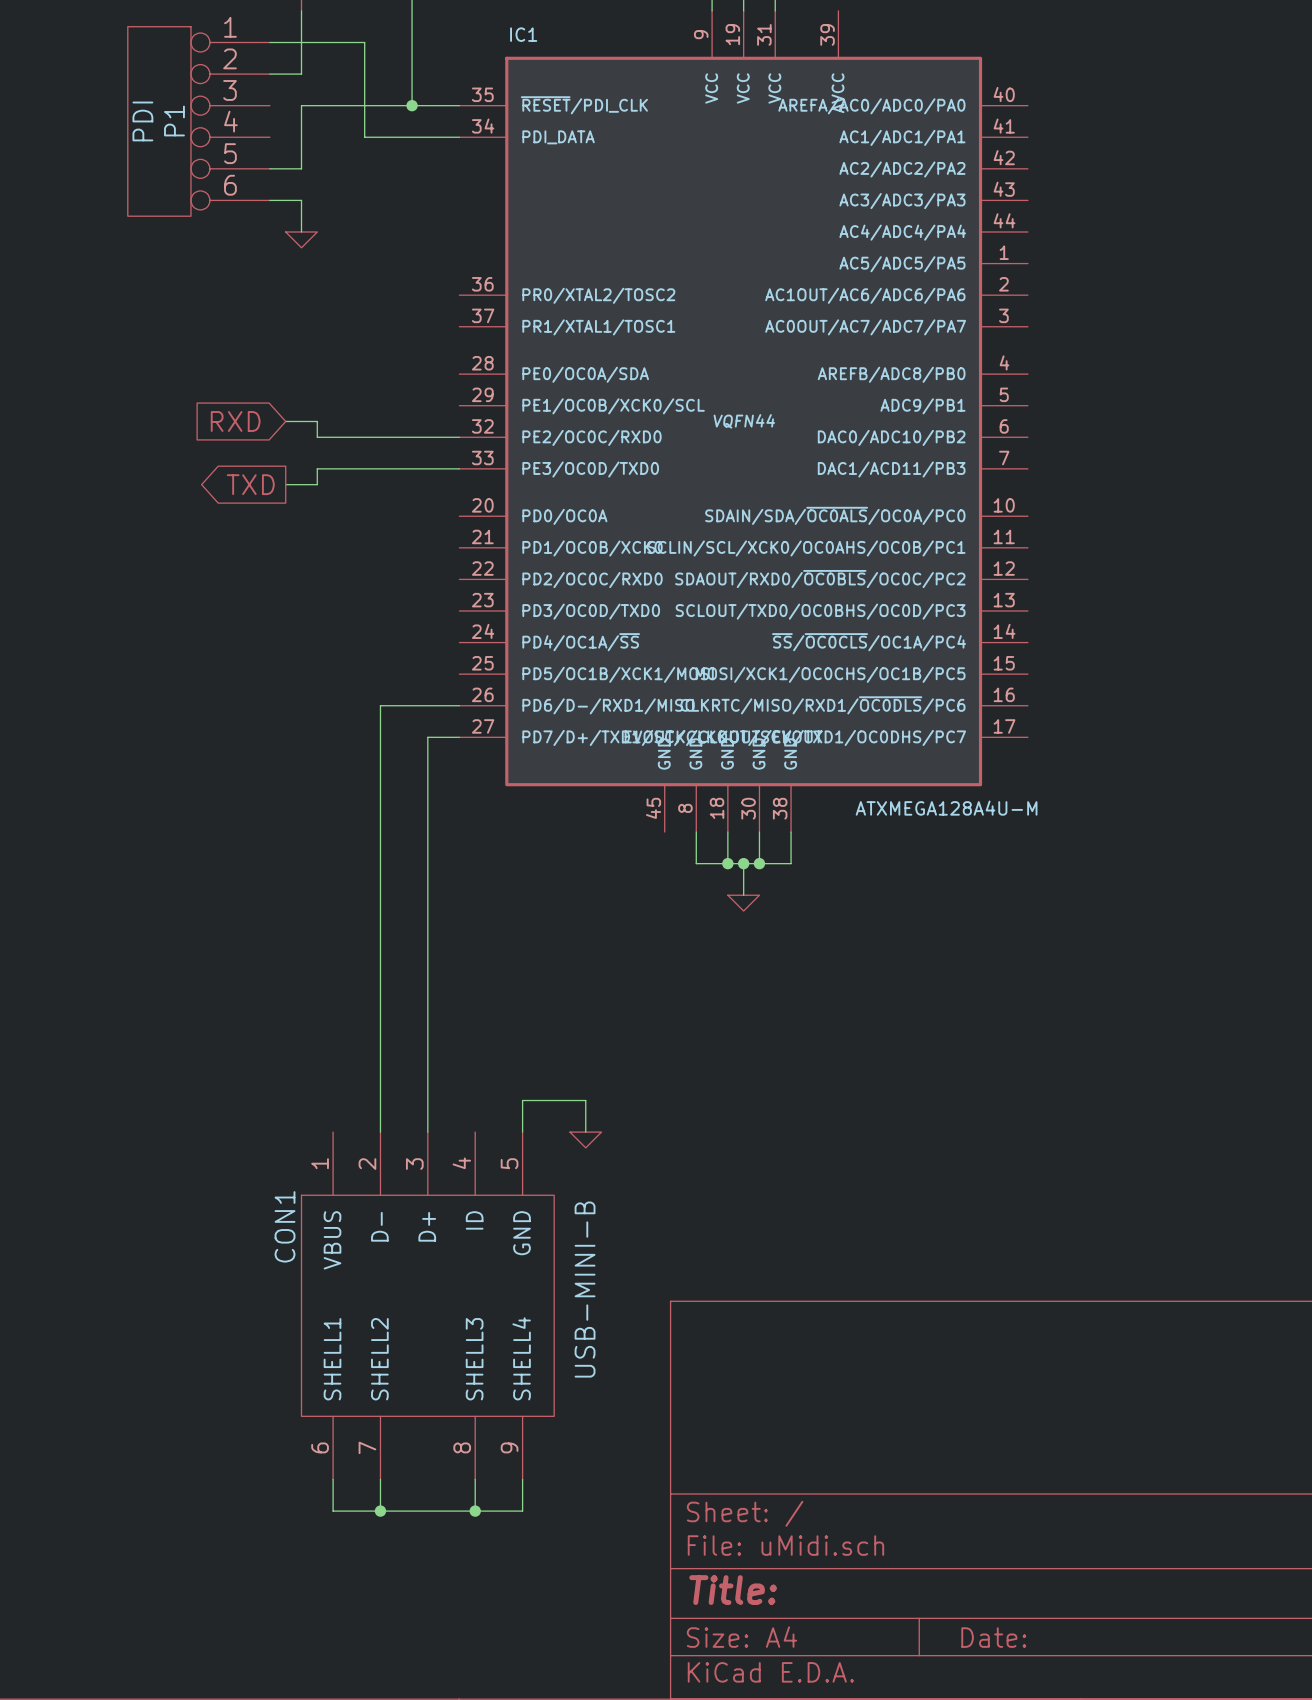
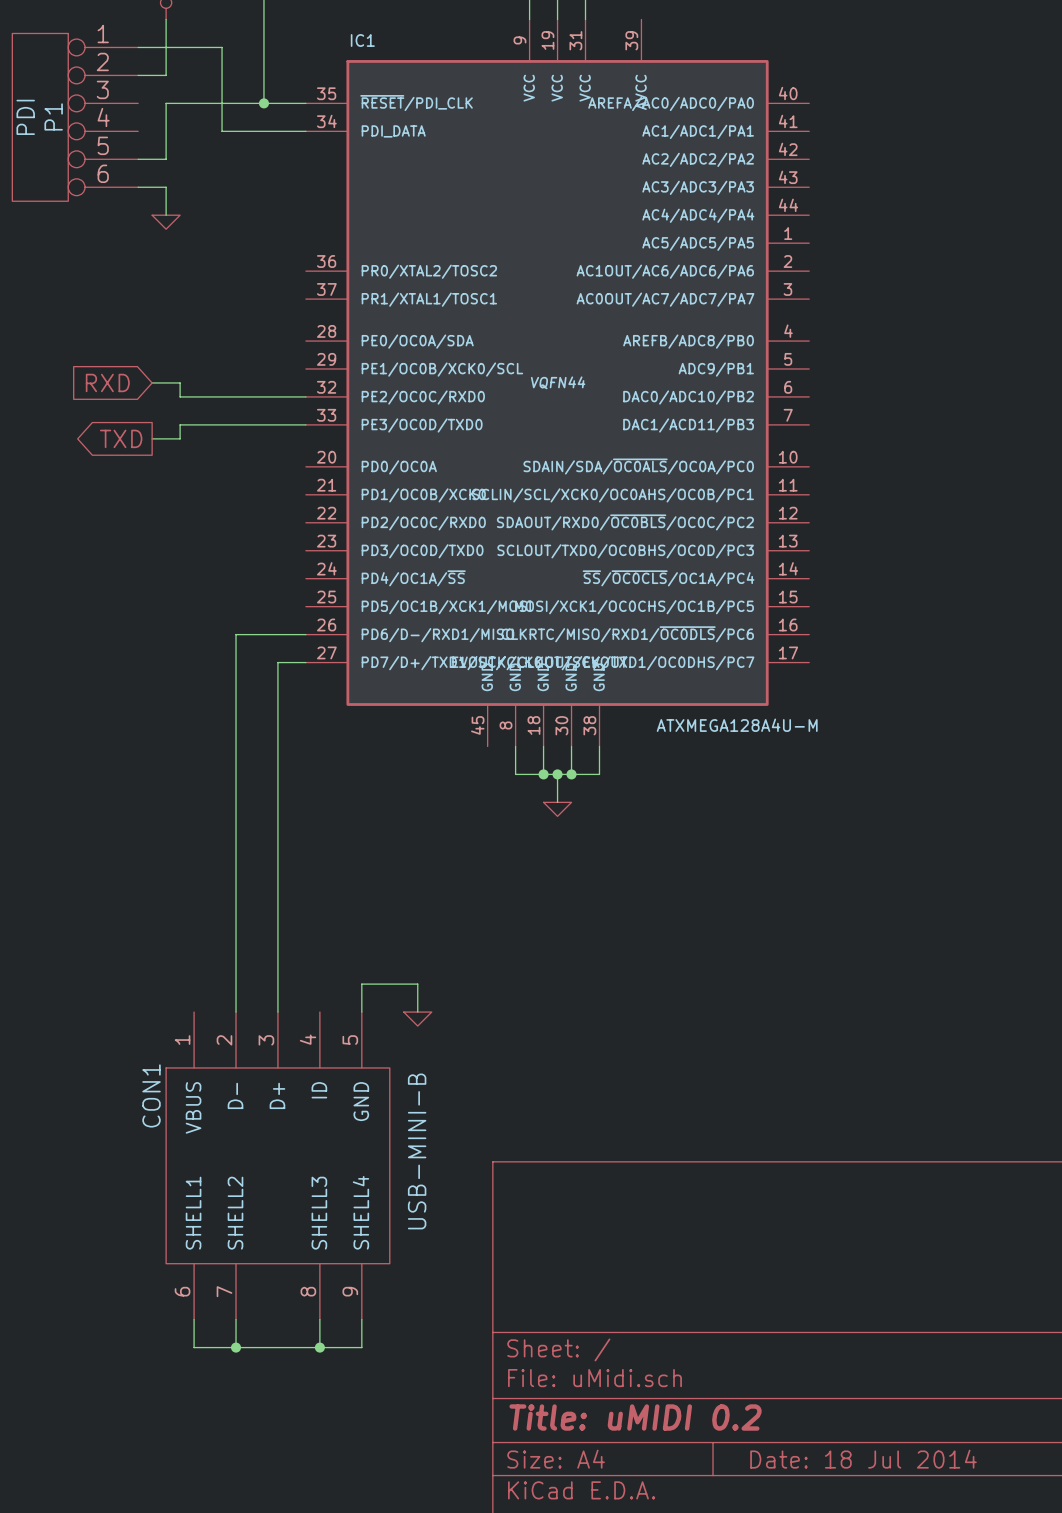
title block: Title: (733, 1590) -> Title: uMIDI 0.2 (635, 1417)
title block: Date: (993, 1637) -> Date: 18 Jul 2014 (863, 1459)

